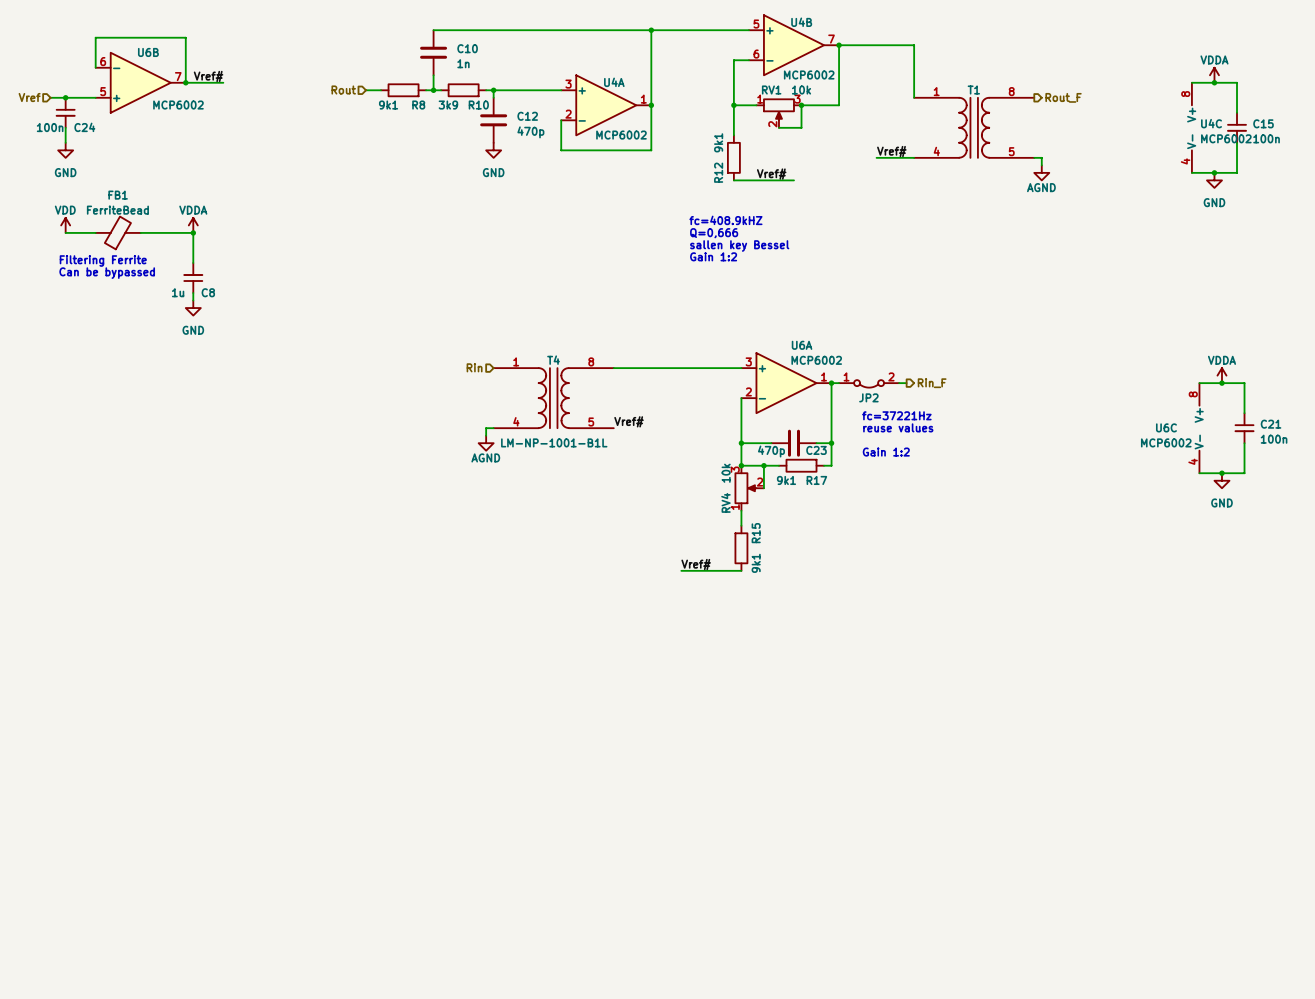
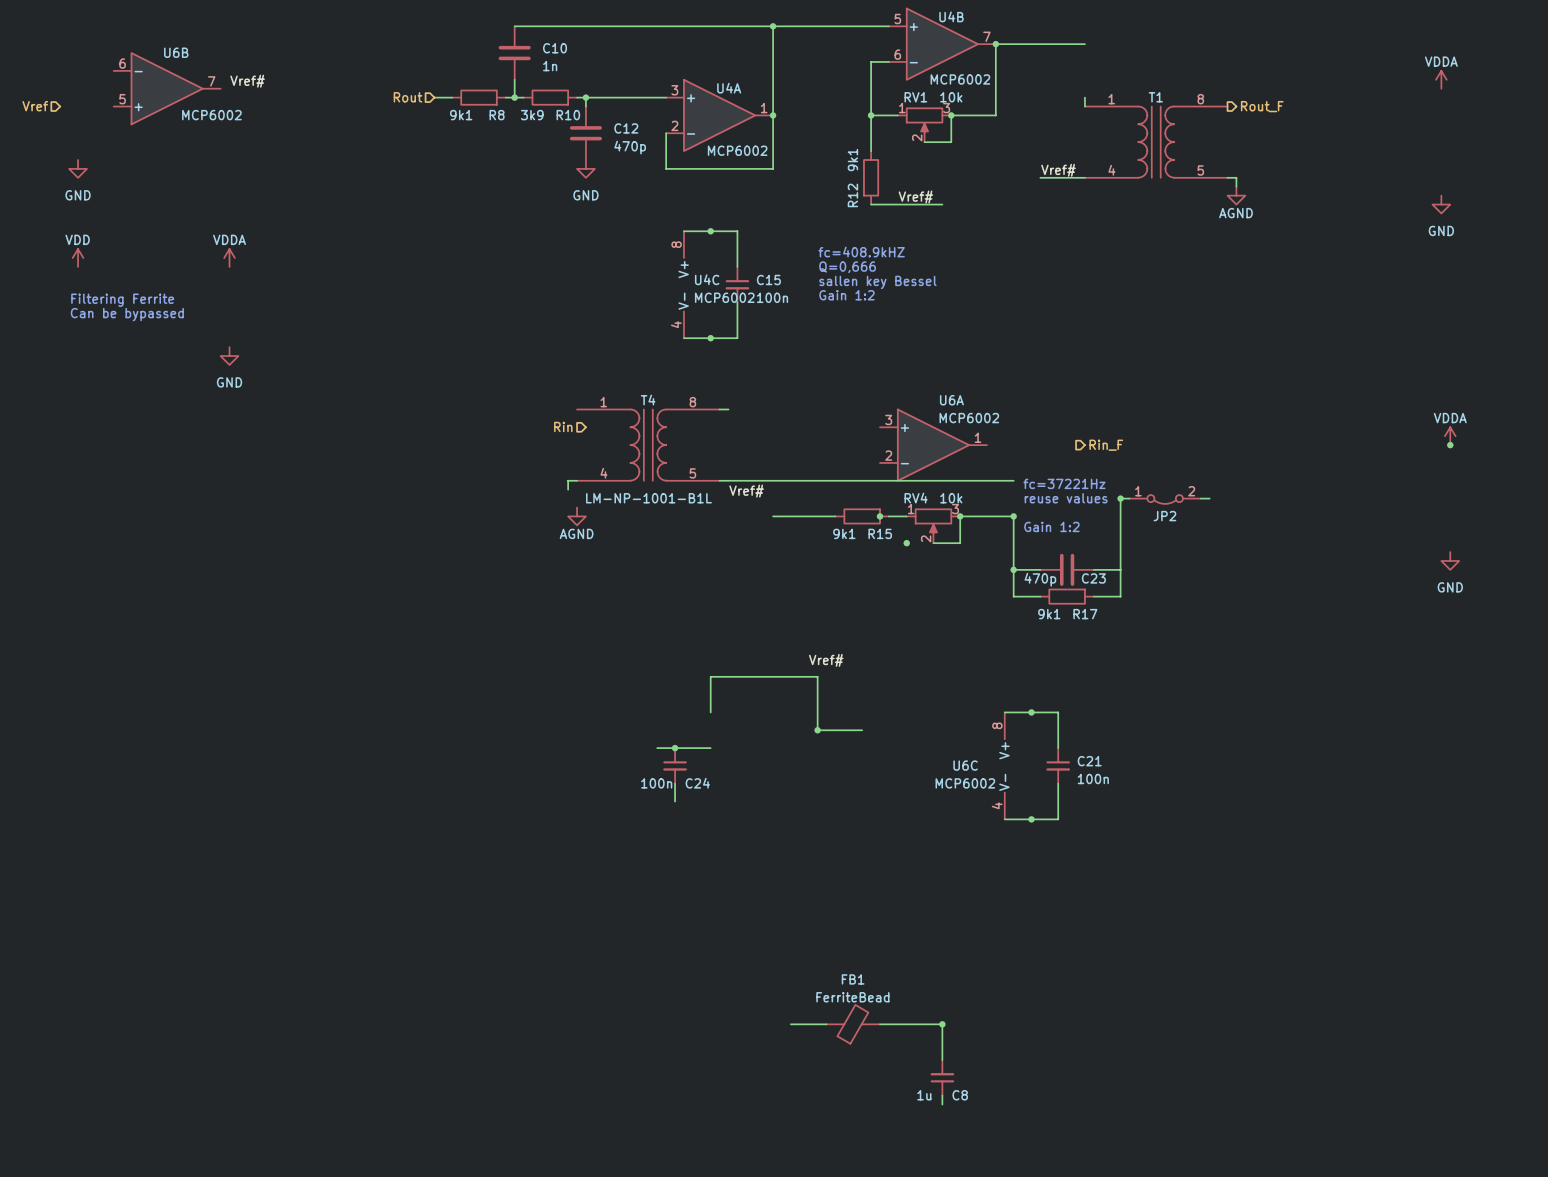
wire: (914, 45) (914, 90) -> none
wire: (95, 67) (95, 37) (185, 37) (185, 82) (223, 82) -> none
junction: (185, 82) -> none
wire: (1191, 82) (1237, 82) (1237, 112) -> none
junction: (1214, 82) -> none
wire: (50, 97) (95, 97) -> none
junction: (65, 97) -> none
C24 position: (65, 112) -> (675, 765)
wire: (65, 127) (65, 142) -> none
U4C position: (1191, 127) -> (683, 284)
C15 position: (1237, 127) -> (737, 284)
wire: (1237, 142) (1237, 172) (1191, 172) -> none
junction: (1214, 172) -> none
wire: none -> (683, 231) (737, 231) (737, 266)
junction: none -> (710, 231)
wire: (65, 232) (95, 232) -> none
FB1 position: (118, 232) -> (853, 1024)
wire: (140, 232) (193, 232) (193, 262) -> none
junction: (193, 232) -> none
wire: none -> (737, 302) (737, 338) (683, 338)
C8 position: (193, 278) -> (942, 1077)
wire: (193, 293) (193, 300) -> none
junction: none -> (710, 338)
wire: none -> (719, 409) (728, 409)
wire: (613, 368) (741, 368) -> none
junction: (831, 383) -> none
wire: (839, 383) (831, 383) (831, 465) (824, 465) -> none
JP2 position: (869, 383) -> (1165, 499)
wire: (899, 383) (906, 383) -> (1200, 498) (1209, 498)
wire: (1199, 383) (1244, 383) (1244, 413) -> none
T4 position: (553, 398) -> (648, 445)
wire: (741, 398) (741, 465) (778, 465) -> none
wire: none -> (719, 480) (1013, 480)
wire: (493, 428) (486, 428) (486, 435) -> (577, 480) (568, 480) (568, 489)
junction: none -> (1120, 498)
wire: none -> (1129, 498) (1120, 498) (1120, 596) (1093, 596)
U6C position: (1199, 428) -> (1004, 765)
C21 position: (1244, 428) -> (1058, 765)
wire: none -> (773, 516) (835, 516)
C23 position: (793, 443) -> (1067, 569)
junction: none -> (960, 516)
wire: none -> (969, 516) (960, 516) (960, 543) (933, 543)
wire: none -> (986, 516) (1013, 516) (1013, 596) (1040, 596)
junction: (831, 443) -> none
junction: none -> (1013, 516)
wire: (1244, 443) (1244, 473) (1199, 473) -> none
junction: (741, 465) -> none
wire: (763, 465) (763, 488) -> none
R17 position: (801, 465) -> (1067, 596)
junction: (1221, 473) -> none
RV4 rotation: 0° (745, 488) -> 90° clockwise (933, 521)
RV4 position: (749, 488) -> (933, 525)
wire: none -> (1013, 569) (1040, 569)
junction: none -> (1013, 569)
wire: none -> (1093, 569) (1120, 569)
wire: (741, 510) (741, 525) -> none
R15 rotation: 0° (741, 548) -> 90° clockwise (862, 516)
R15 position: (741, 548) -> (862, 516)
wire: (681, 570) (741, 570) -> none
wire: none -> (710, 712) (710, 676) (817, 676) (817, 730) (862, 730)
wire: none -> (1004, 712) (1058, 712) (1058, 748)
junction: none -> (1031, 712)
junction: none -> (817, 730)
wire: none -> (657, 748) (710, 748)
junction: none -> (675, 748)
wire: none -> (675, 783) (675, 801)
wire: none -> (1058, 783) (1058, 819) (1004, 819)
junction: none -> (1031, 819)
wire: none -> (790, 1024) (826, 1024)
wire: none -> (880, 1024) (942, 1024) (942, 1059)
junction: none -> (942, 1024)
wire: none -> (942, 1095) (942, 1104)

